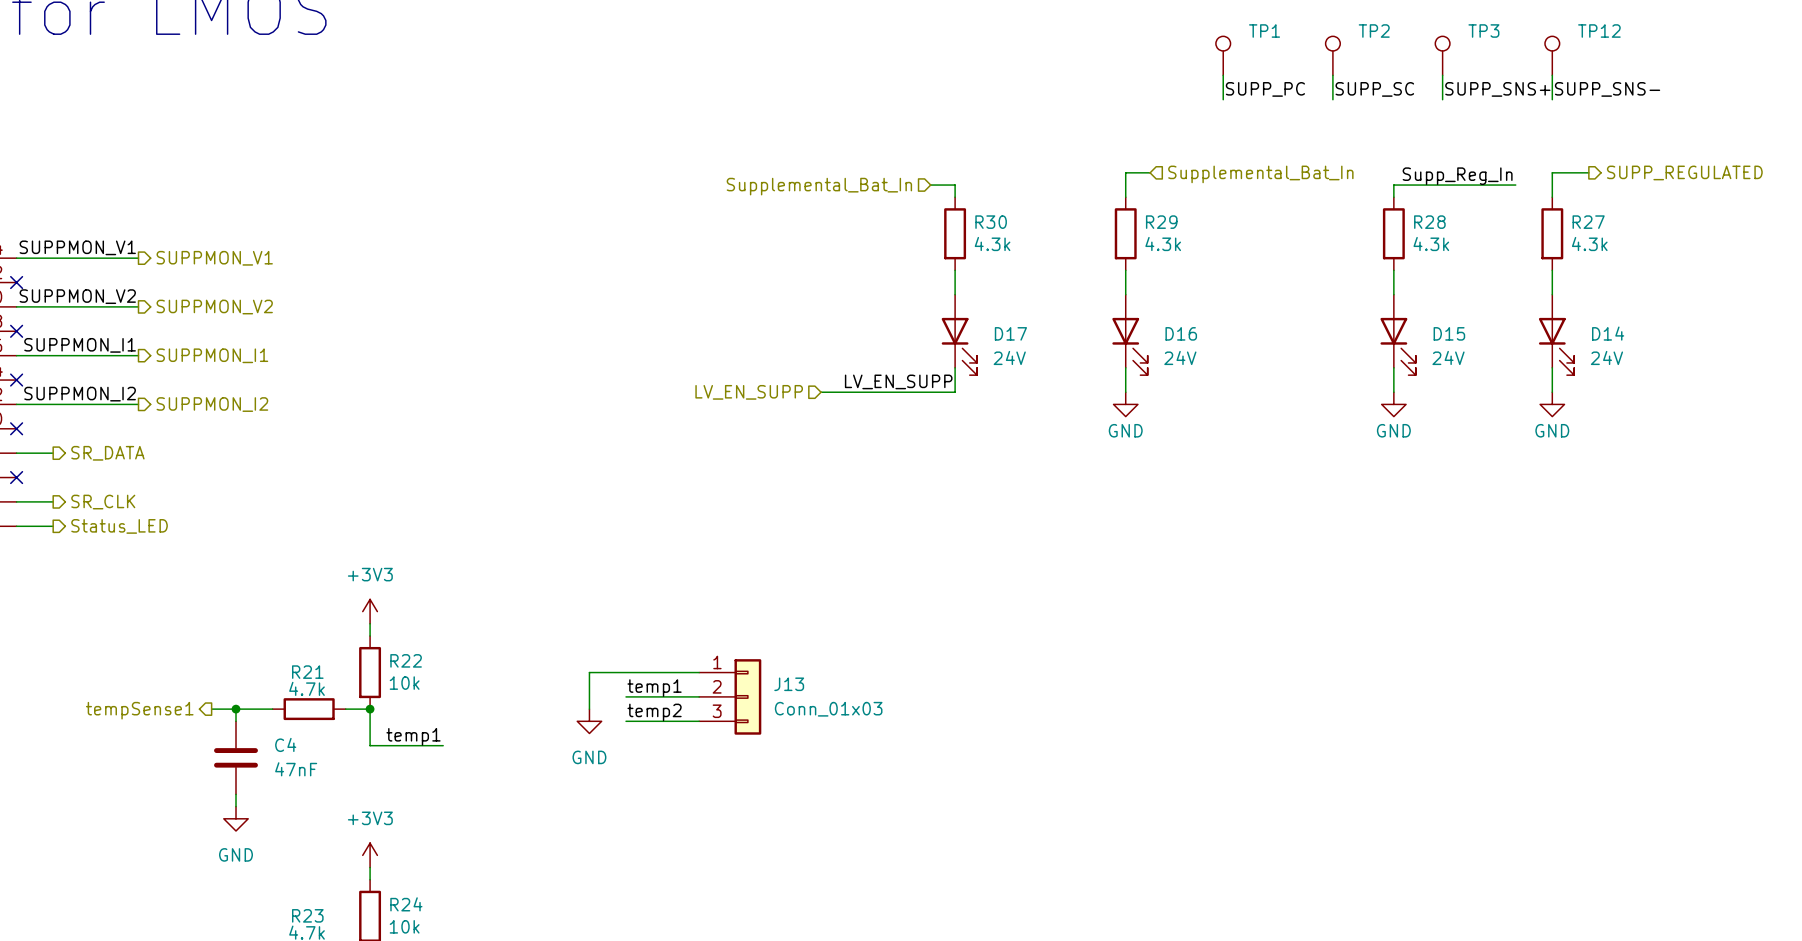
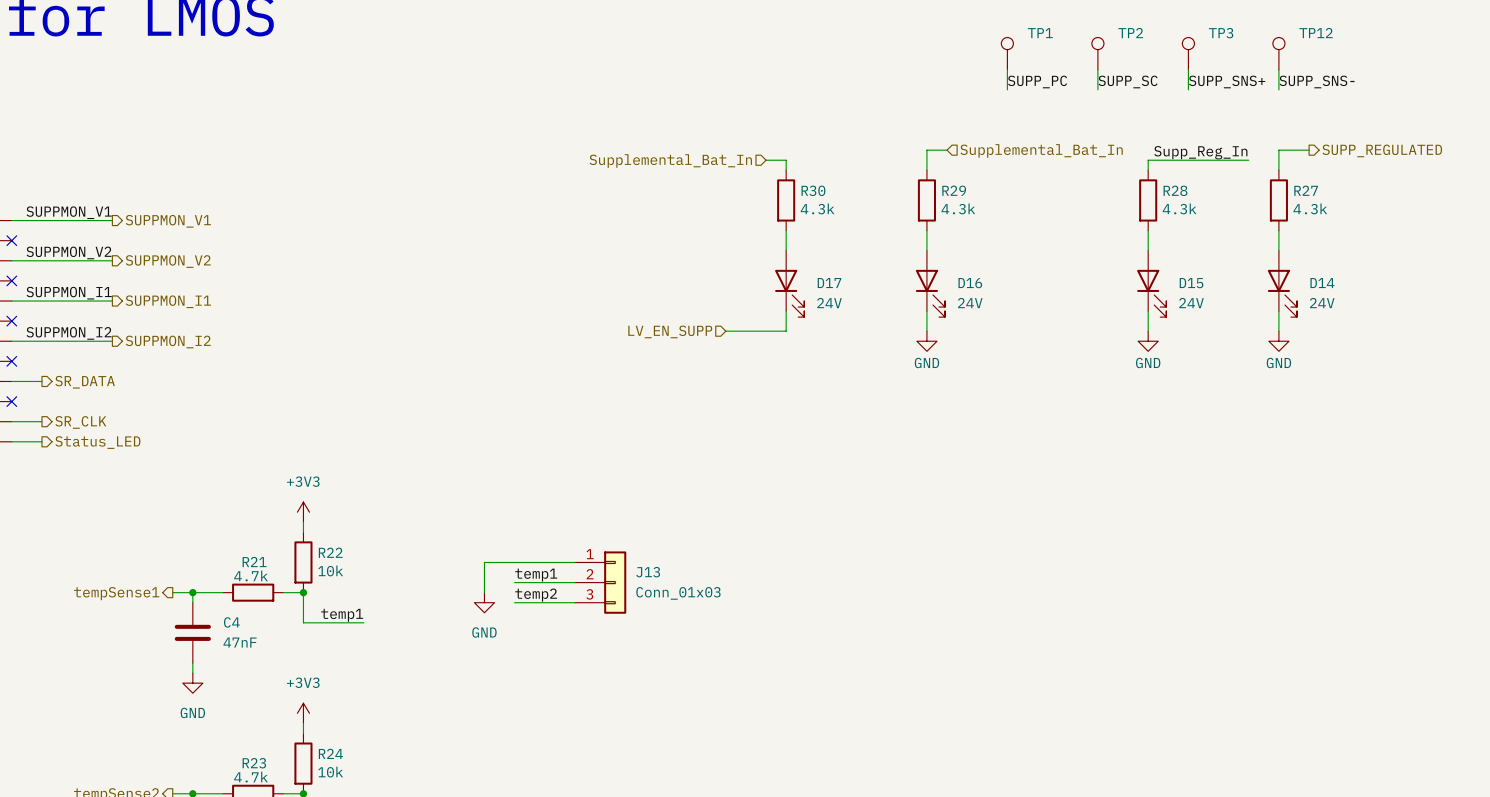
label: LV_EN_SUPP (898, 381) -> none
hierarchical label position: LV_EN_SUPP (749, 392) -> LV_EN_SUPP (670, 331)
wire: (821, 392) (881, 392) -> none

